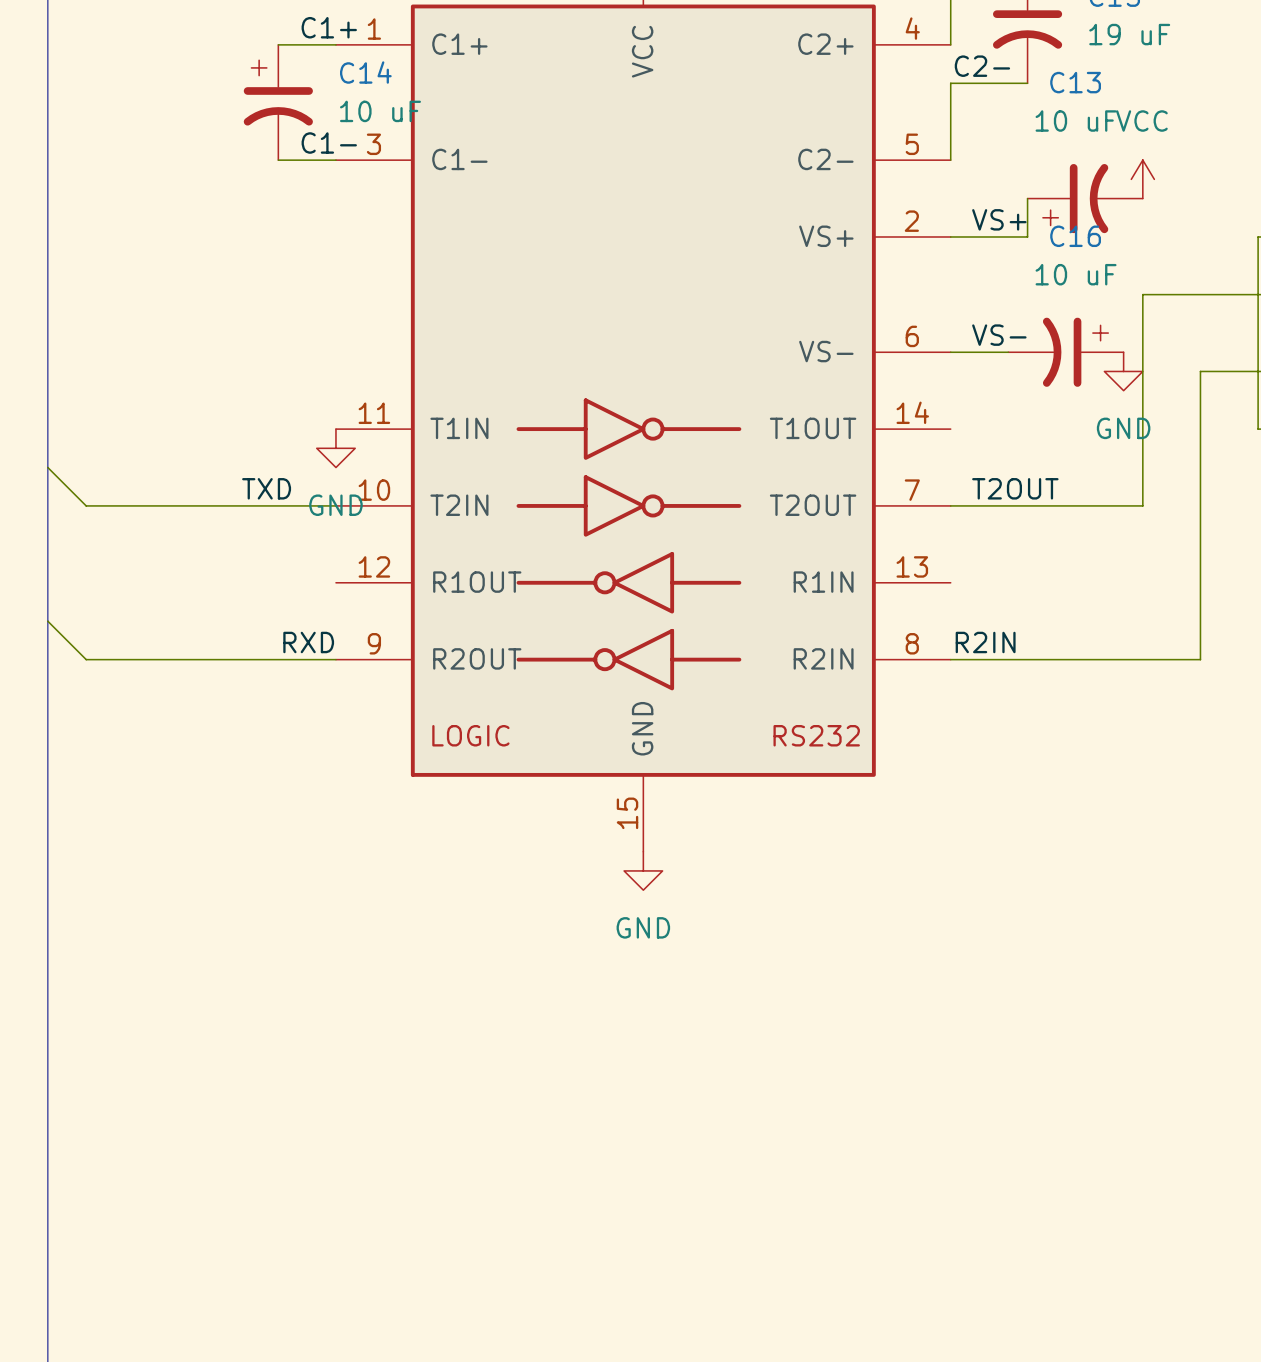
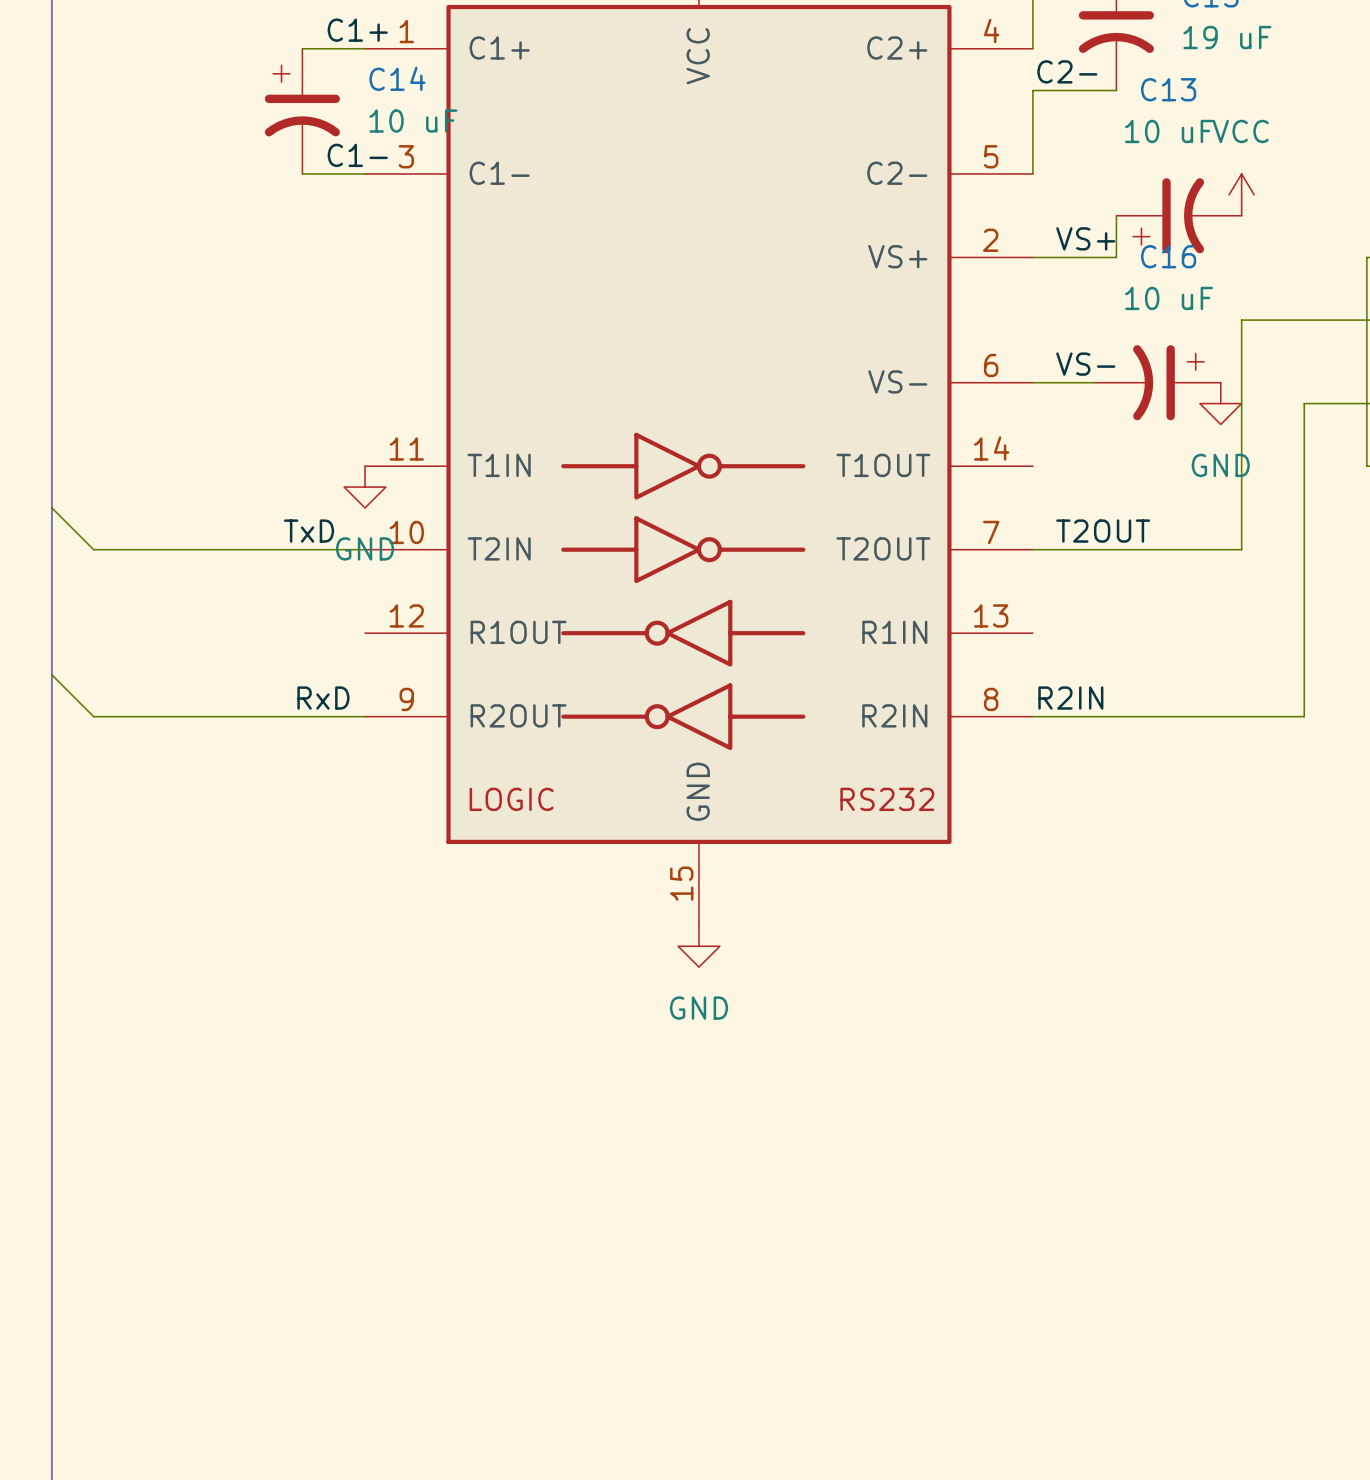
label: TXD (266, 488) -> TxD (309, 531)
label: RXD (308, 642) -> RxD (323, 698)

